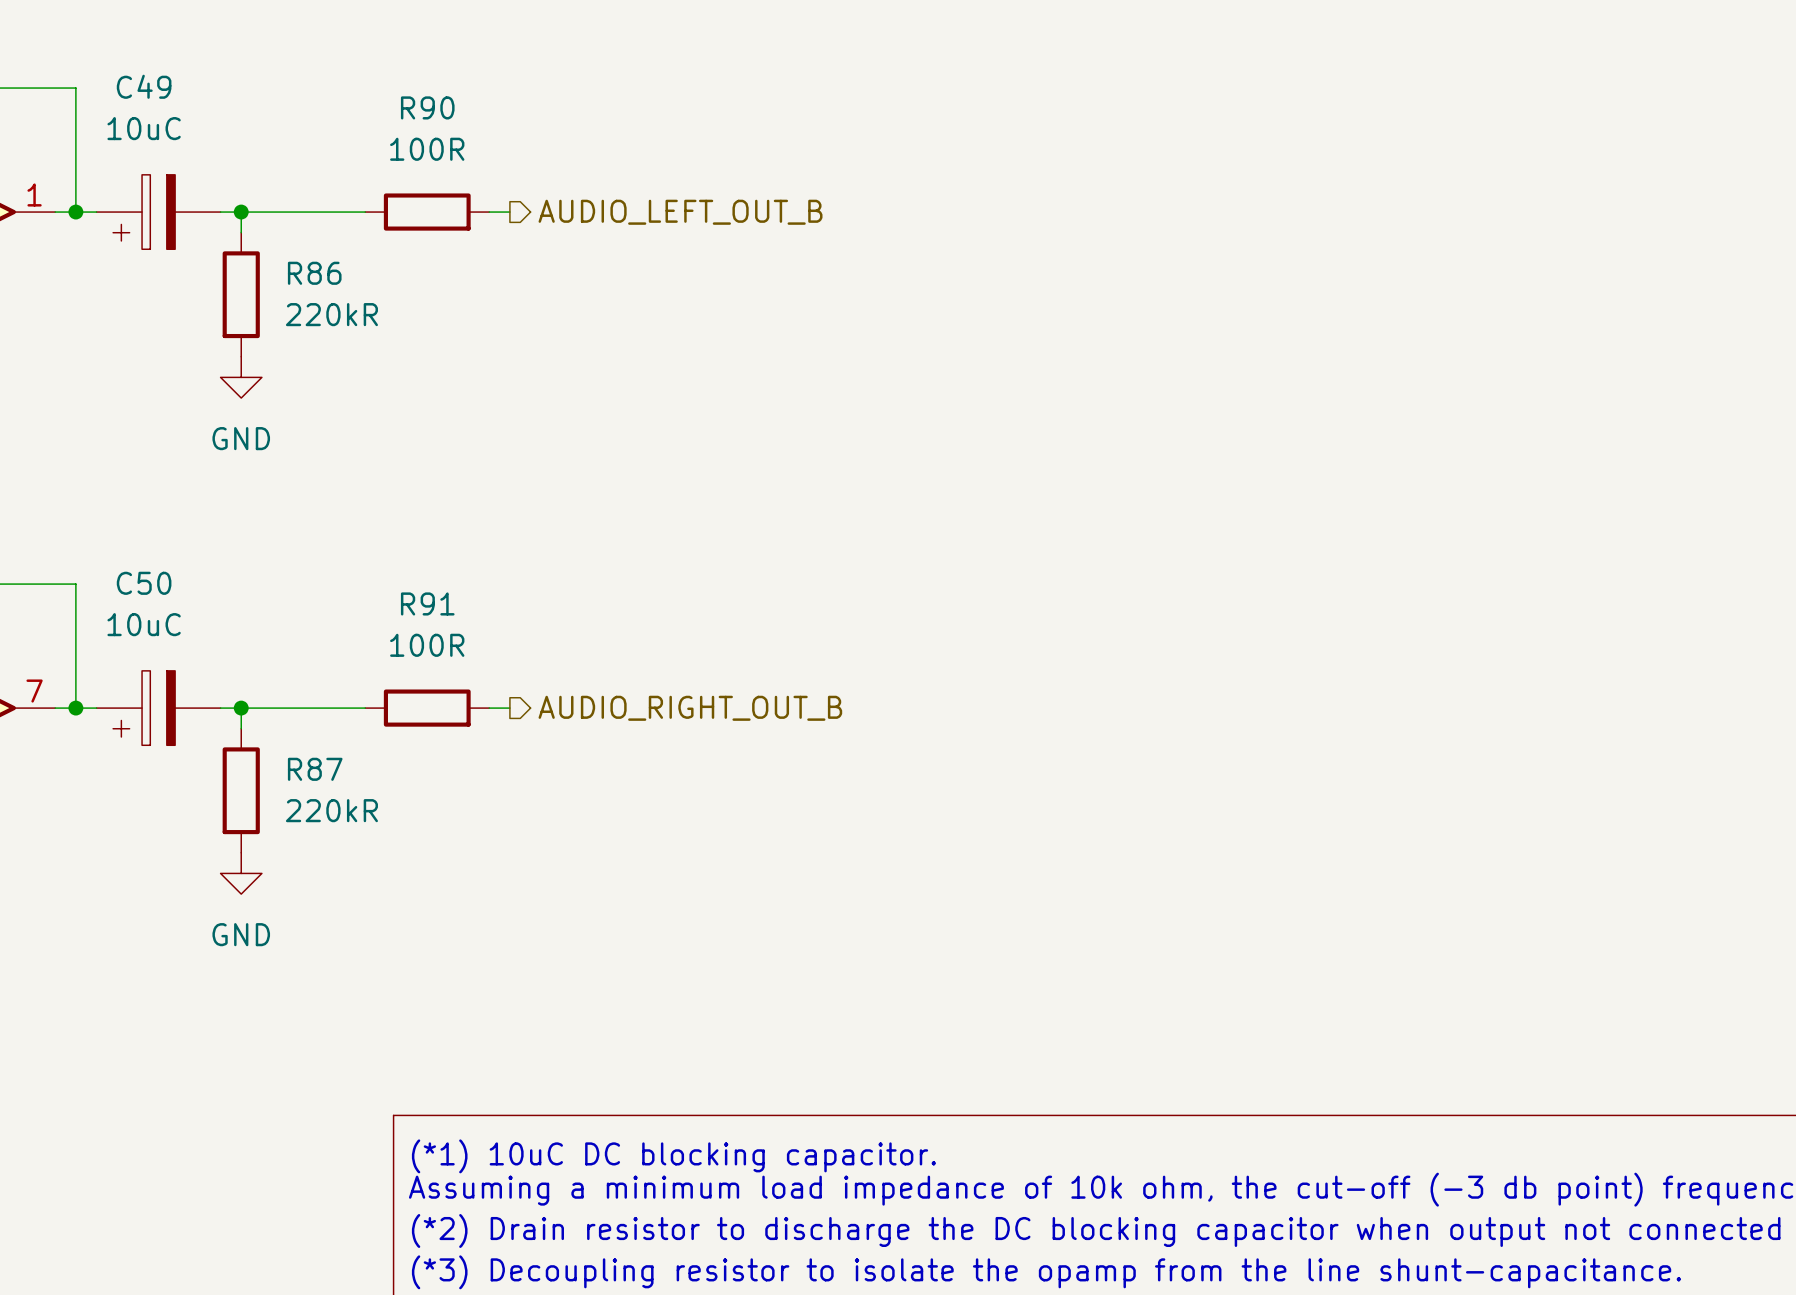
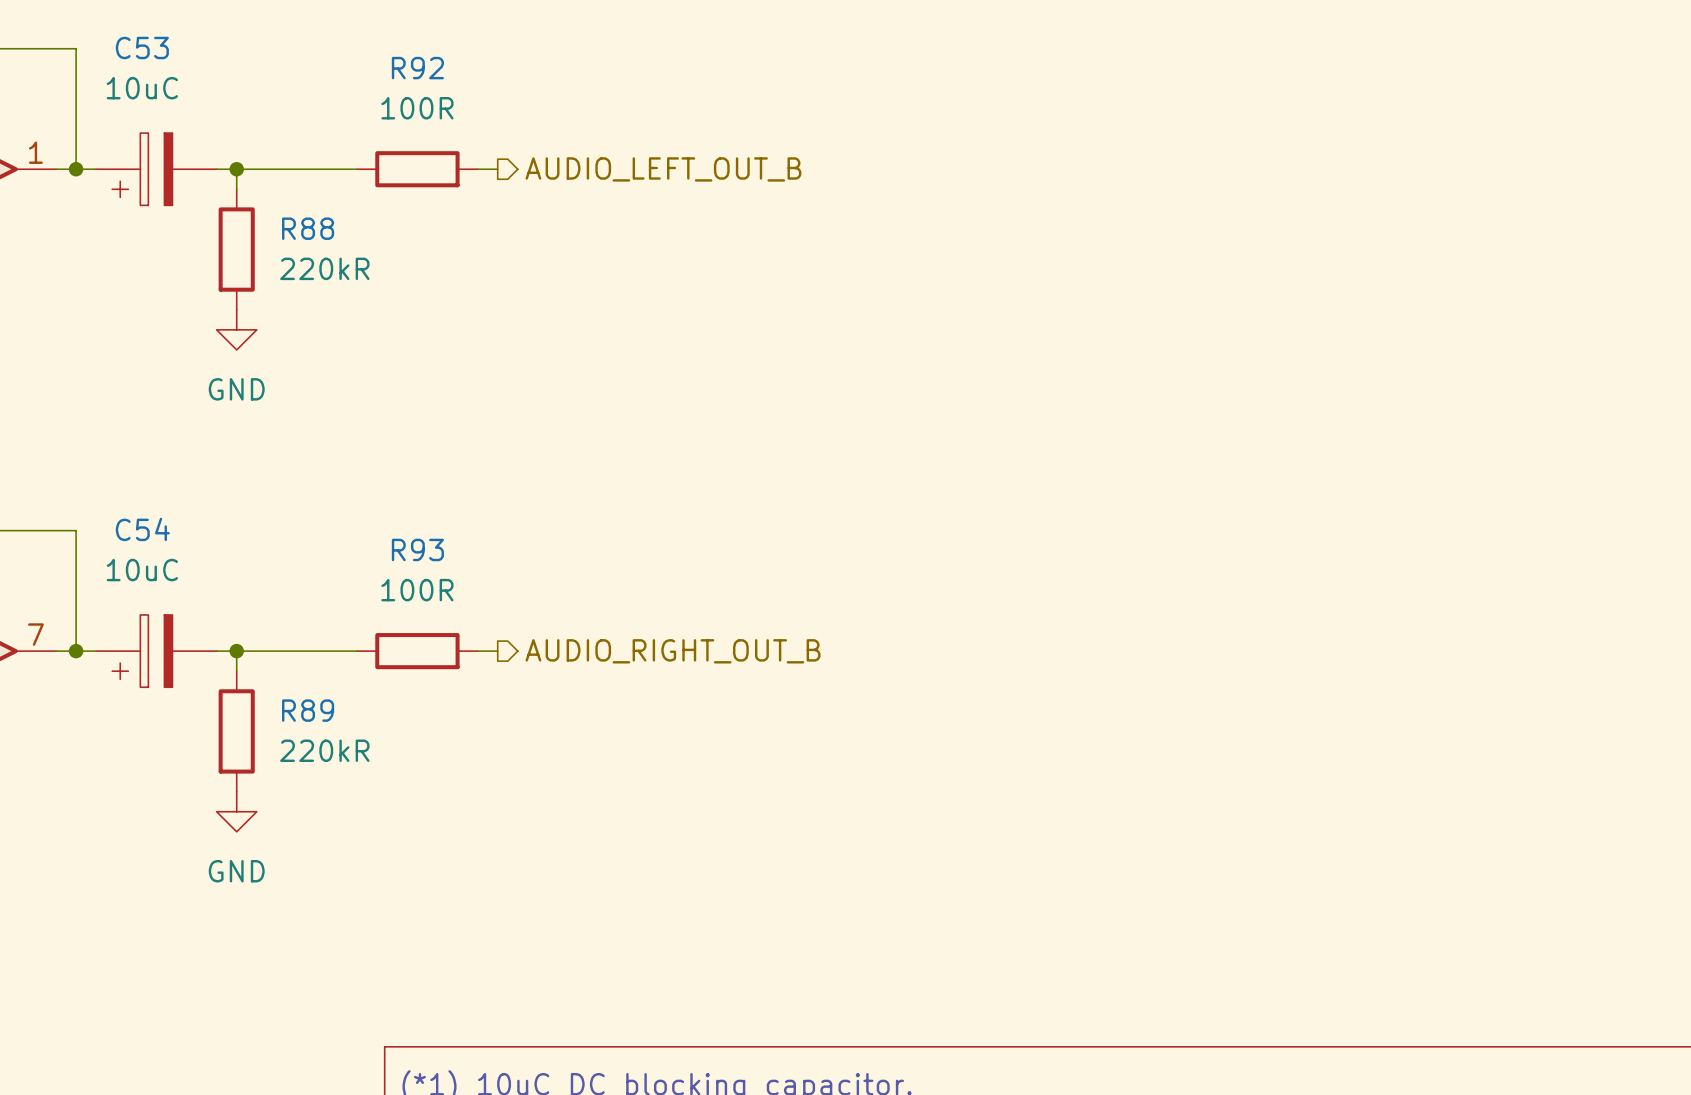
C49 name: C49 (144, 86) -> C53 (142, 48)
R90 name: R90 (427, 107) -> R92 (417, 68)
R86 name: R86 (314, 273) -> R88 (308, 228)
C50 name: C50 (144, 583) -> C54 (142, 529)
R91 name: R91 (427, 603) -> R93 (417, 549)
R87 name: R87 (315, 769) -> R89 (308, 710)

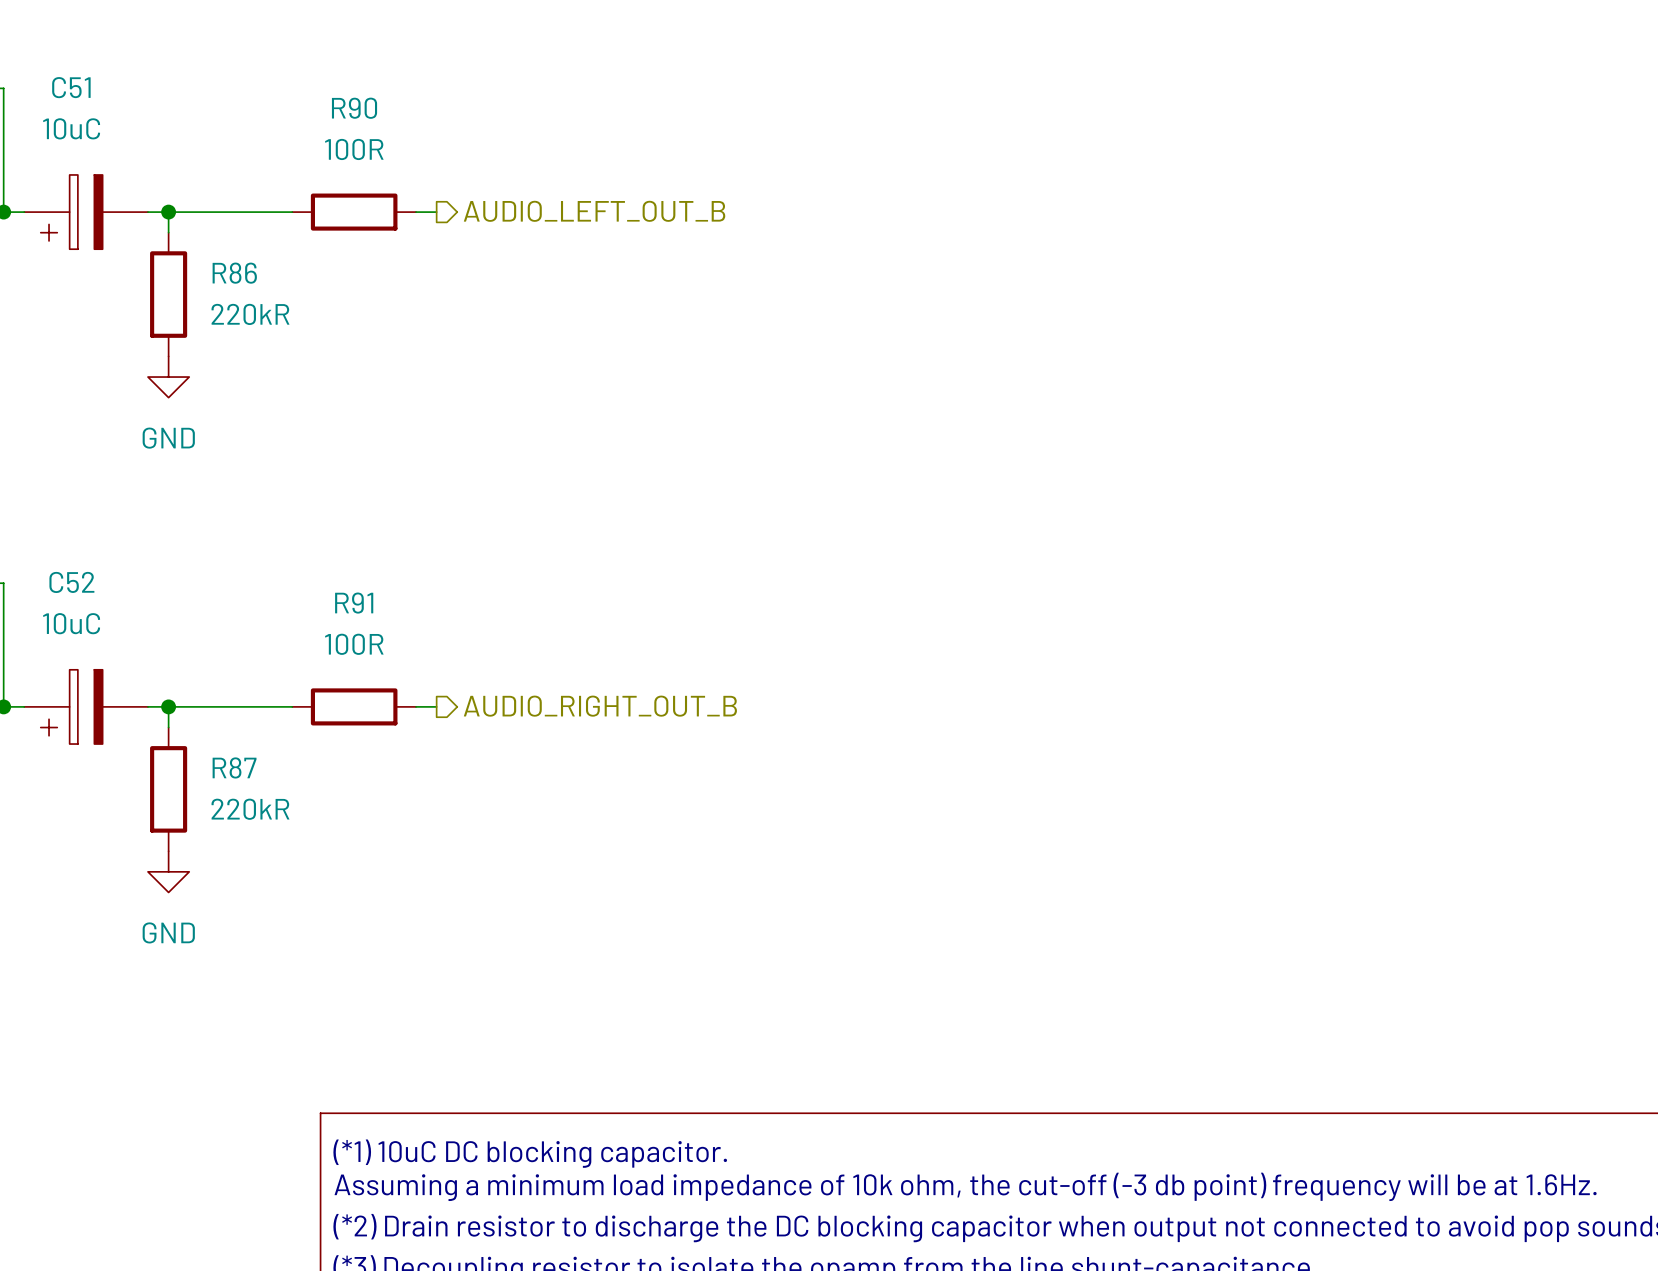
C53 name: C53 (142, 48) -> C51 (71, 87)
R92 name: R92 (417, 68) -> R90 (354, 108)
R88 name: R88 (308, 228) -> R86 (234, 273)
C54 name: C54 (142, 529) -> C52 (71, 582)
R93 name: R93 (417, 549) -> R91 (354, 603)
R89 name: R89 (308, 710) -> R87 (234, 767)

